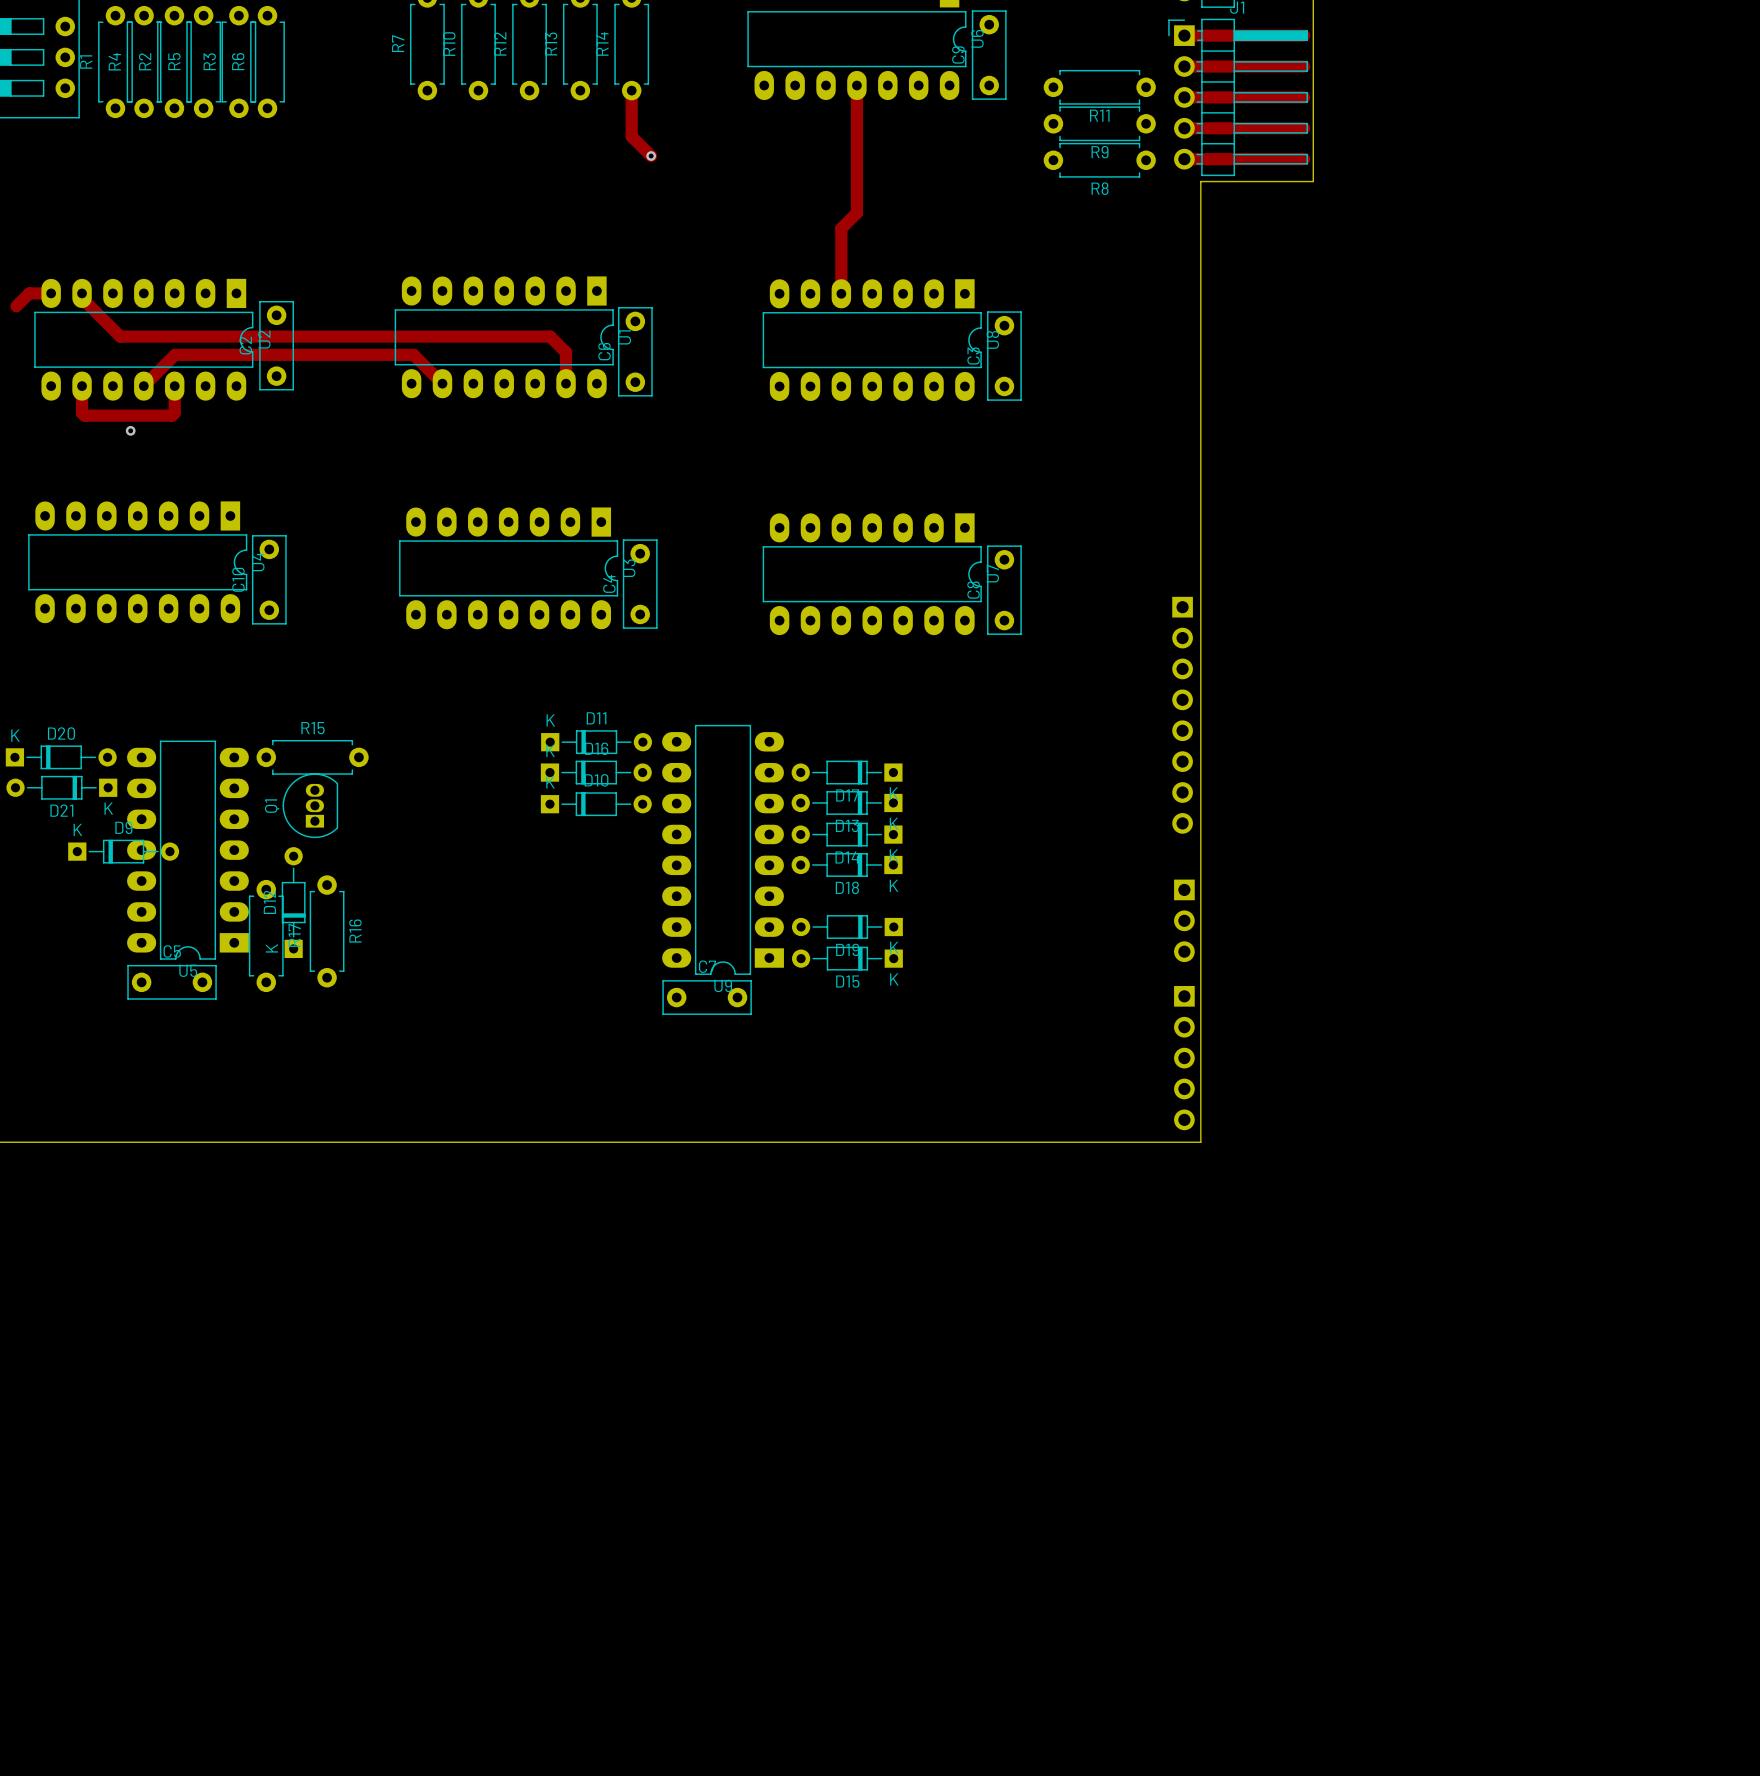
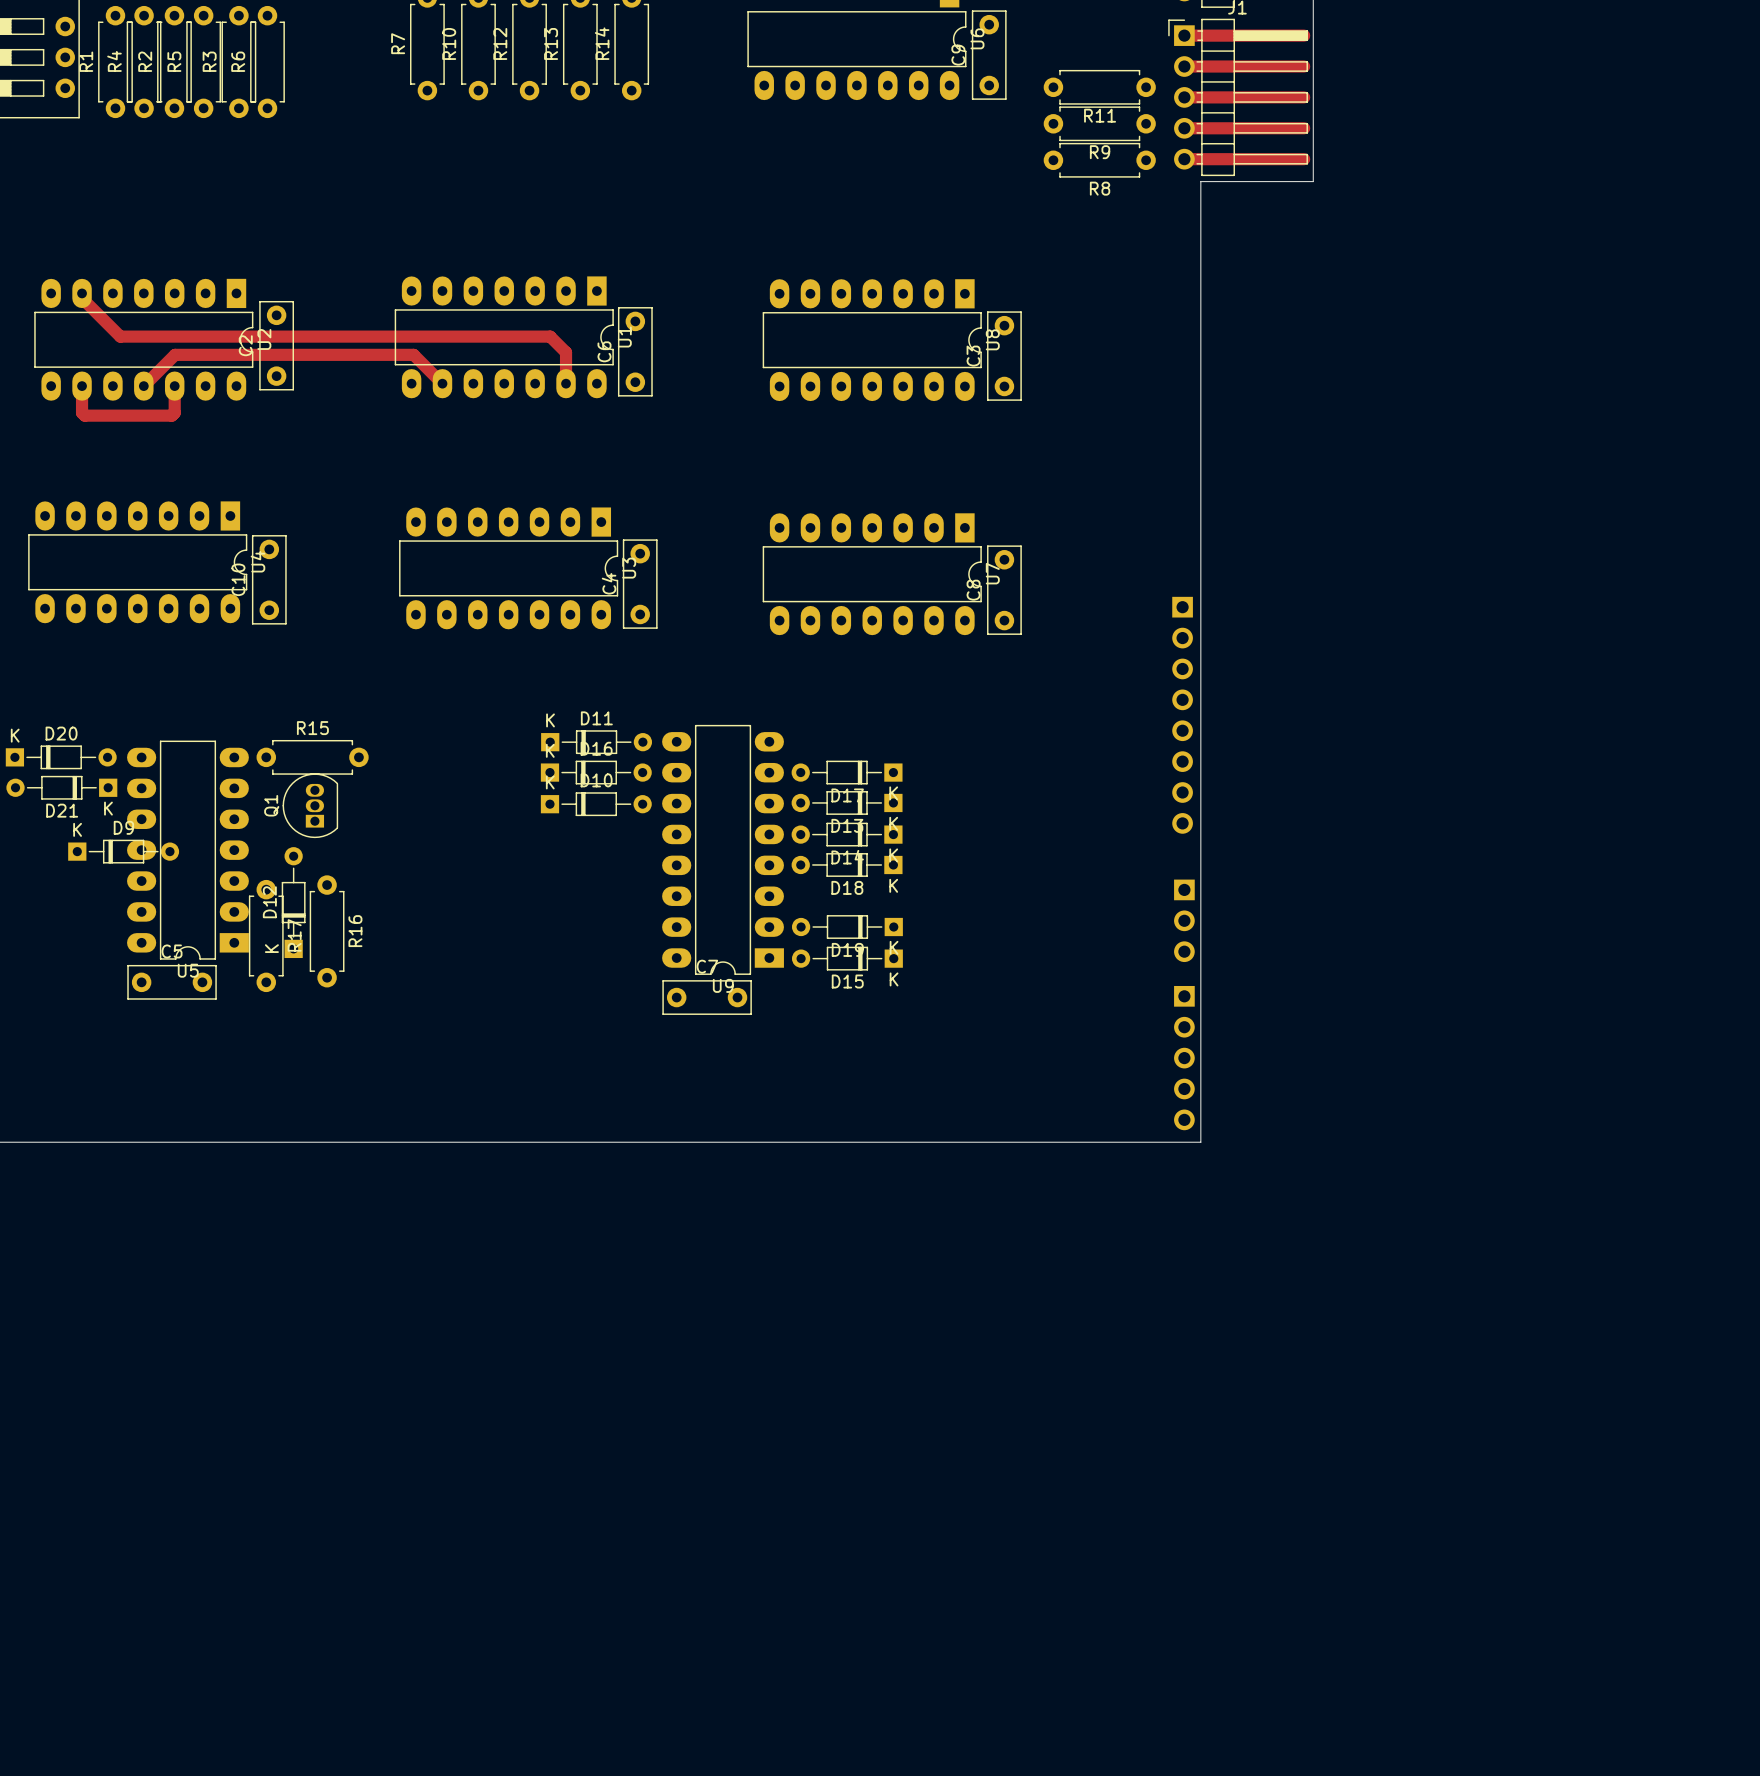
track: (856, 85) (856, 212) (841, 228) (841, 293) -> none
track: (631, 90) (631, 136) (651, 156) -> none
via: (651, 156) -> none
track: (51, 293) (29, 293) (16, 306) -> none
via: (130, 430) -> none

